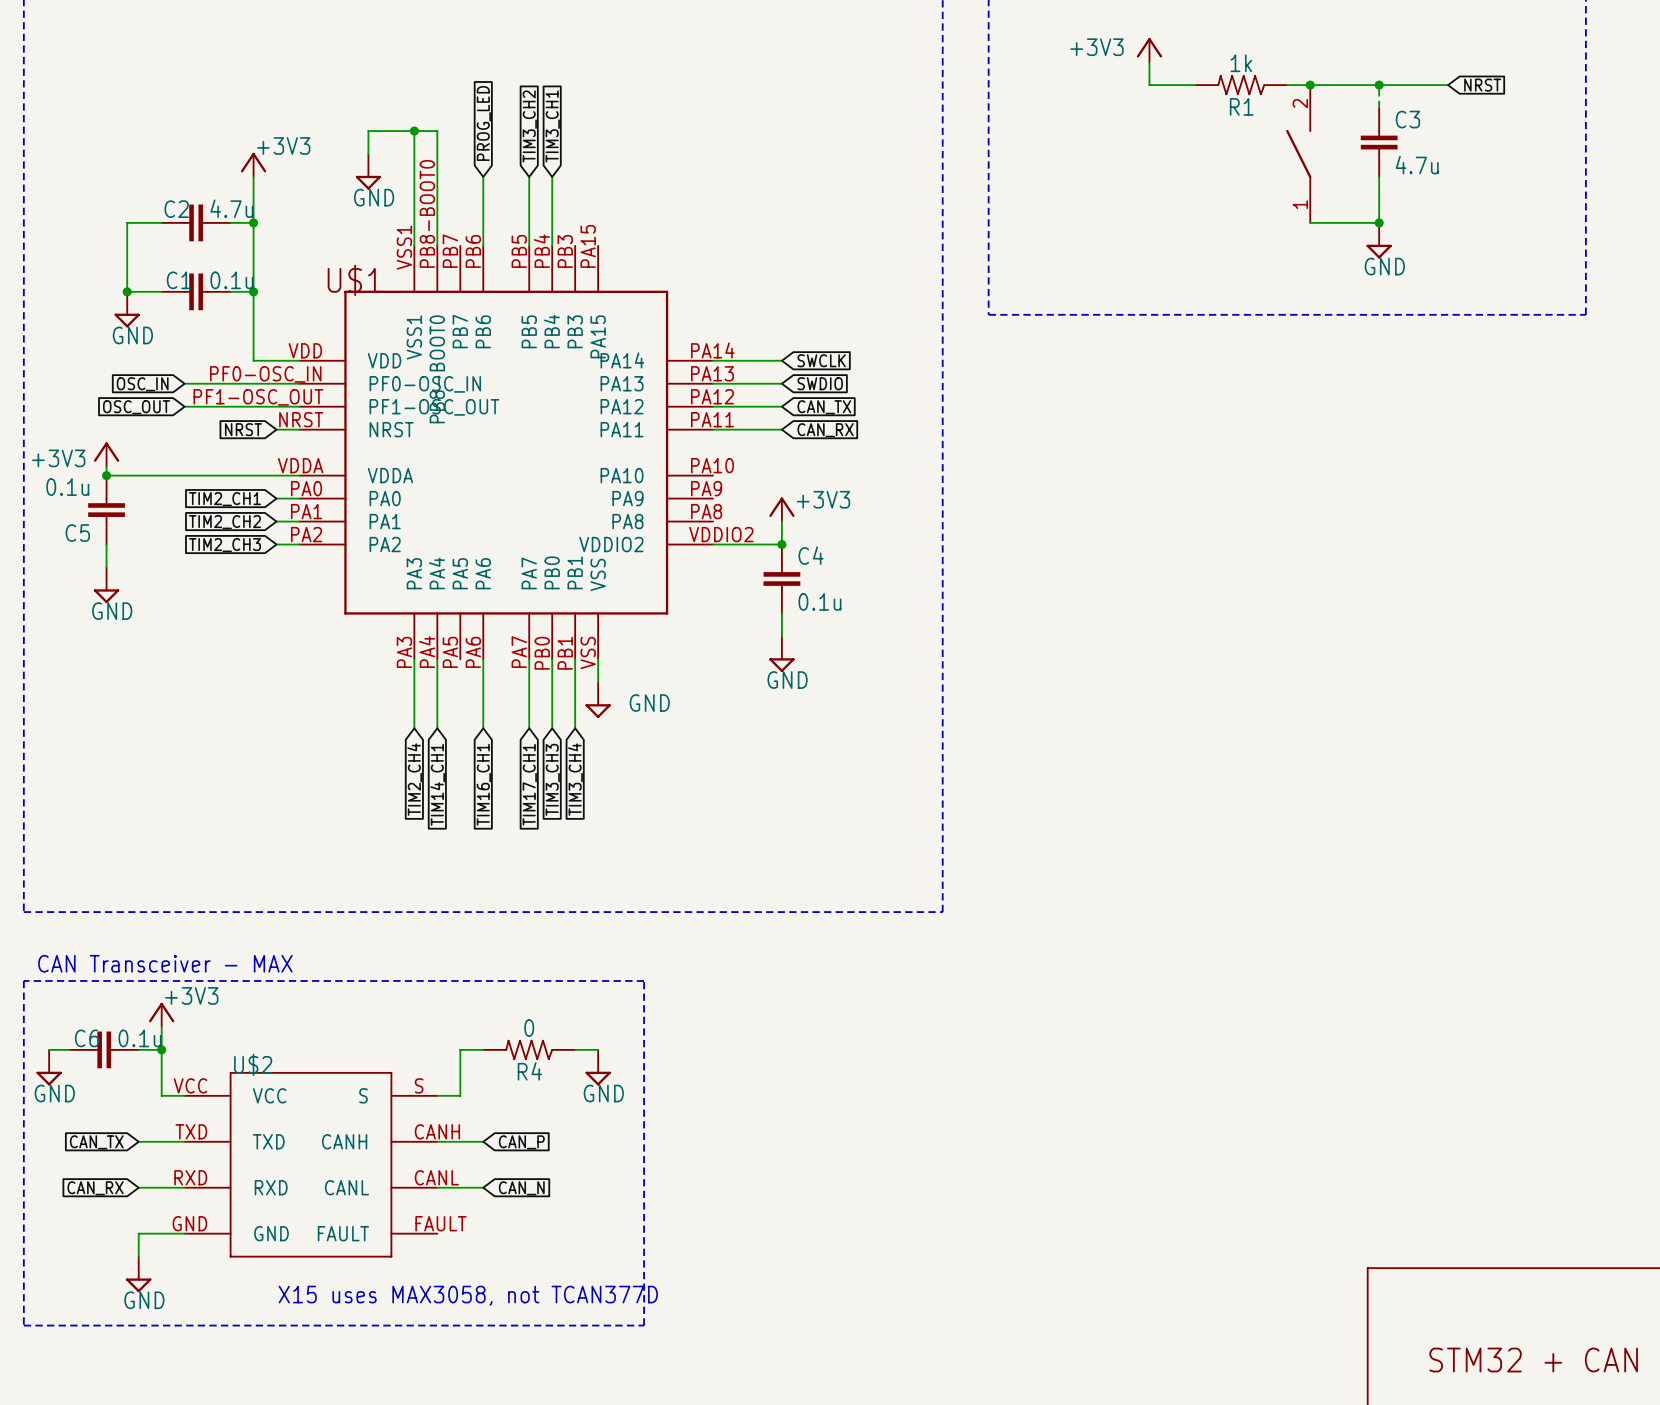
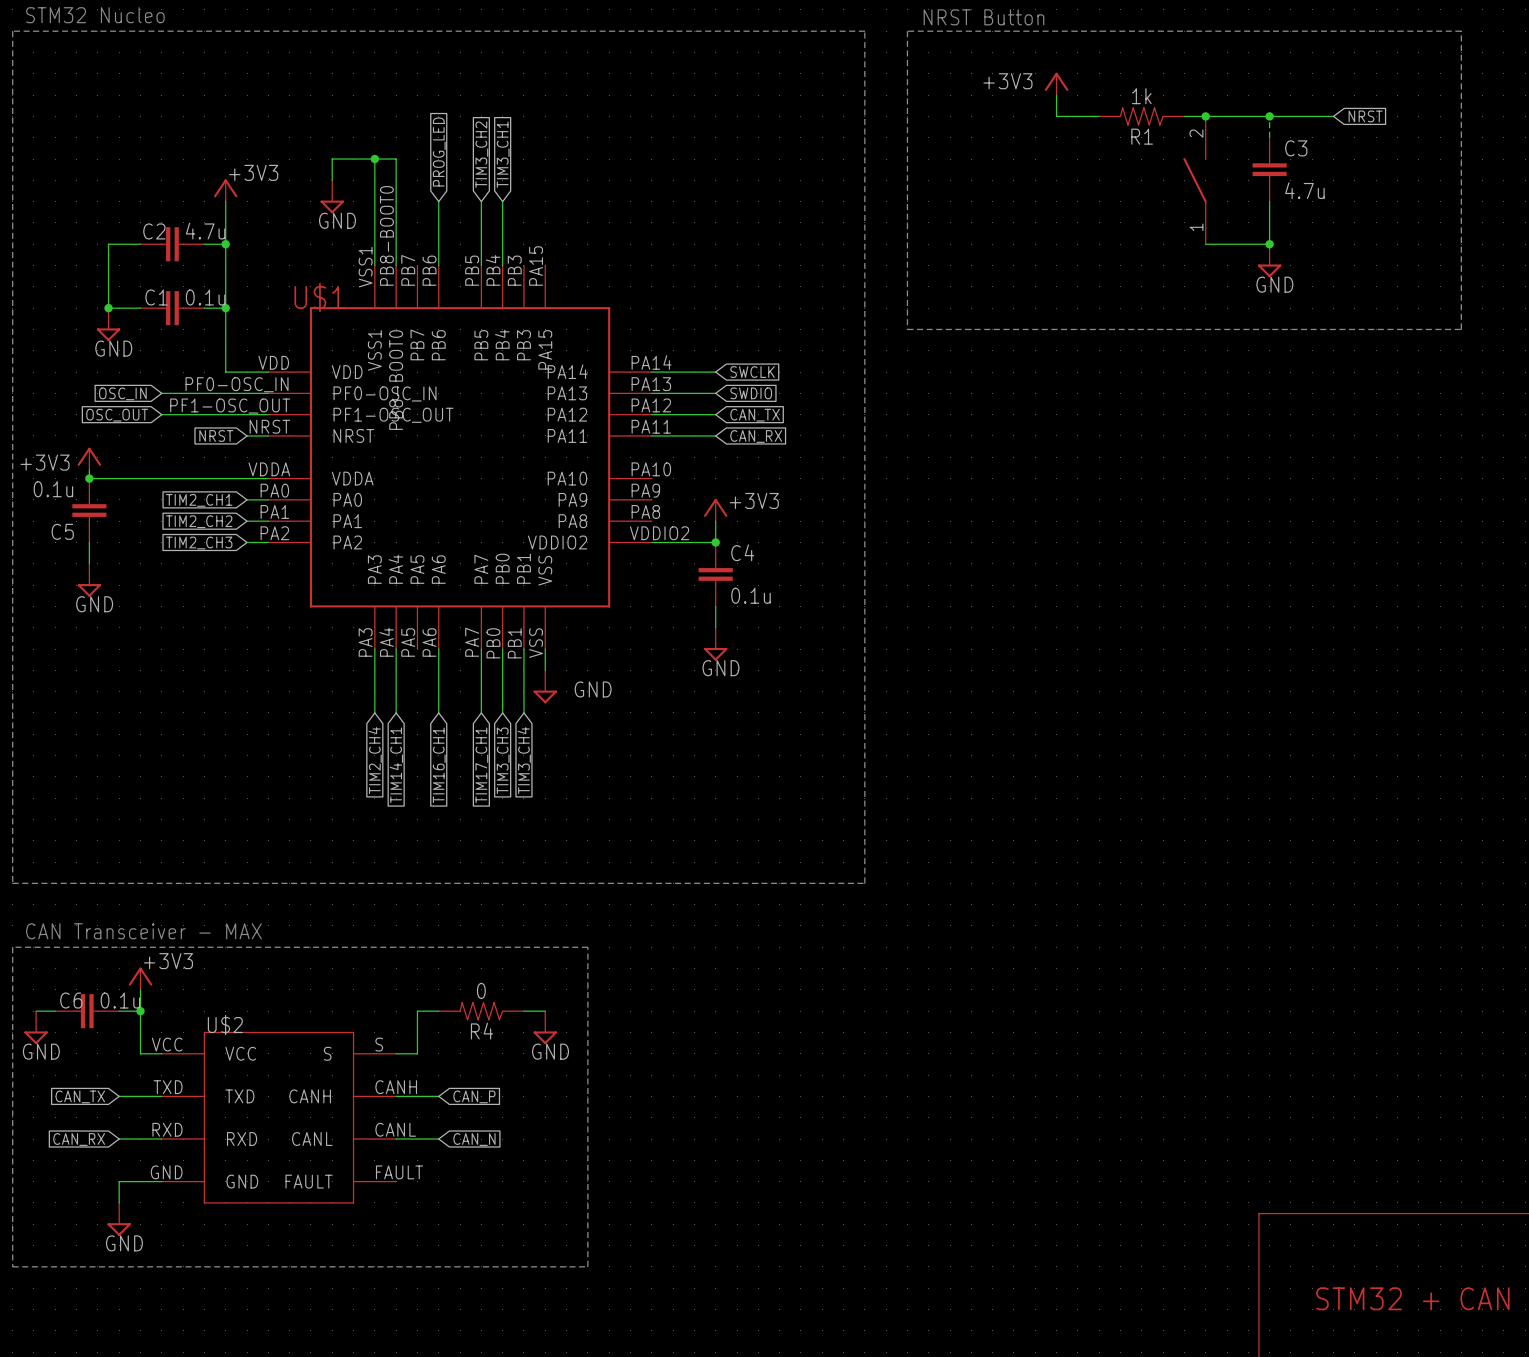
text: X15 uses MAX3058, not TCAN377D (468, 1295) -> none

